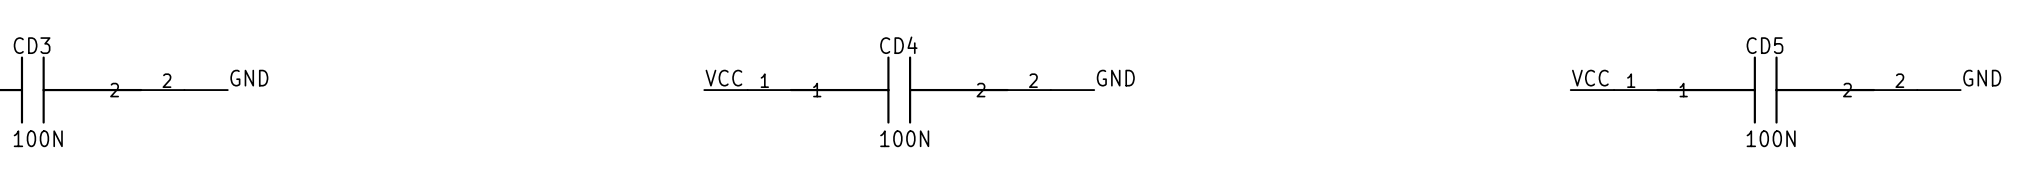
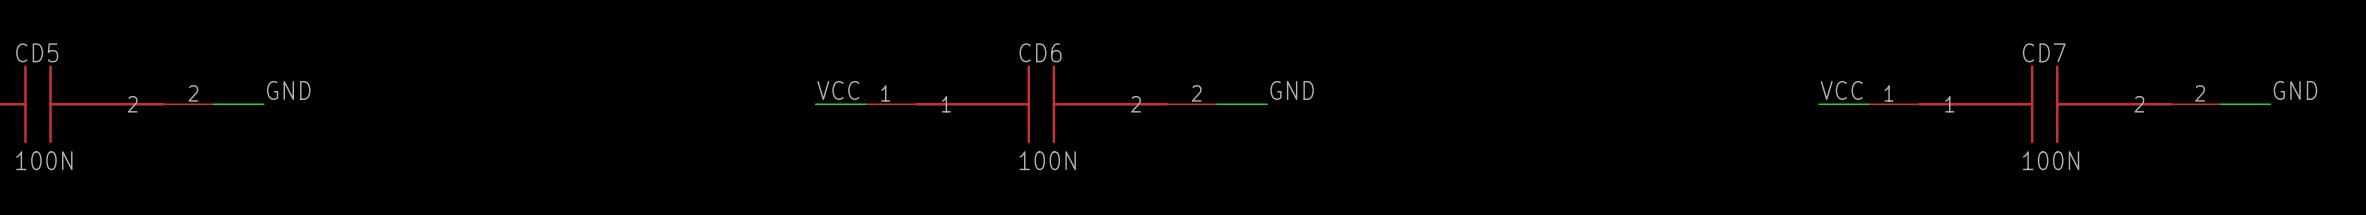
CD3 name: CD3 (32, 45) -> CD5 (37, 52)
CD4 name: CD4 (898, 45) -> CD6 (1040, 52)
CD5 name: CD5 (1764, 45) -> CD7 (2044, 52)

